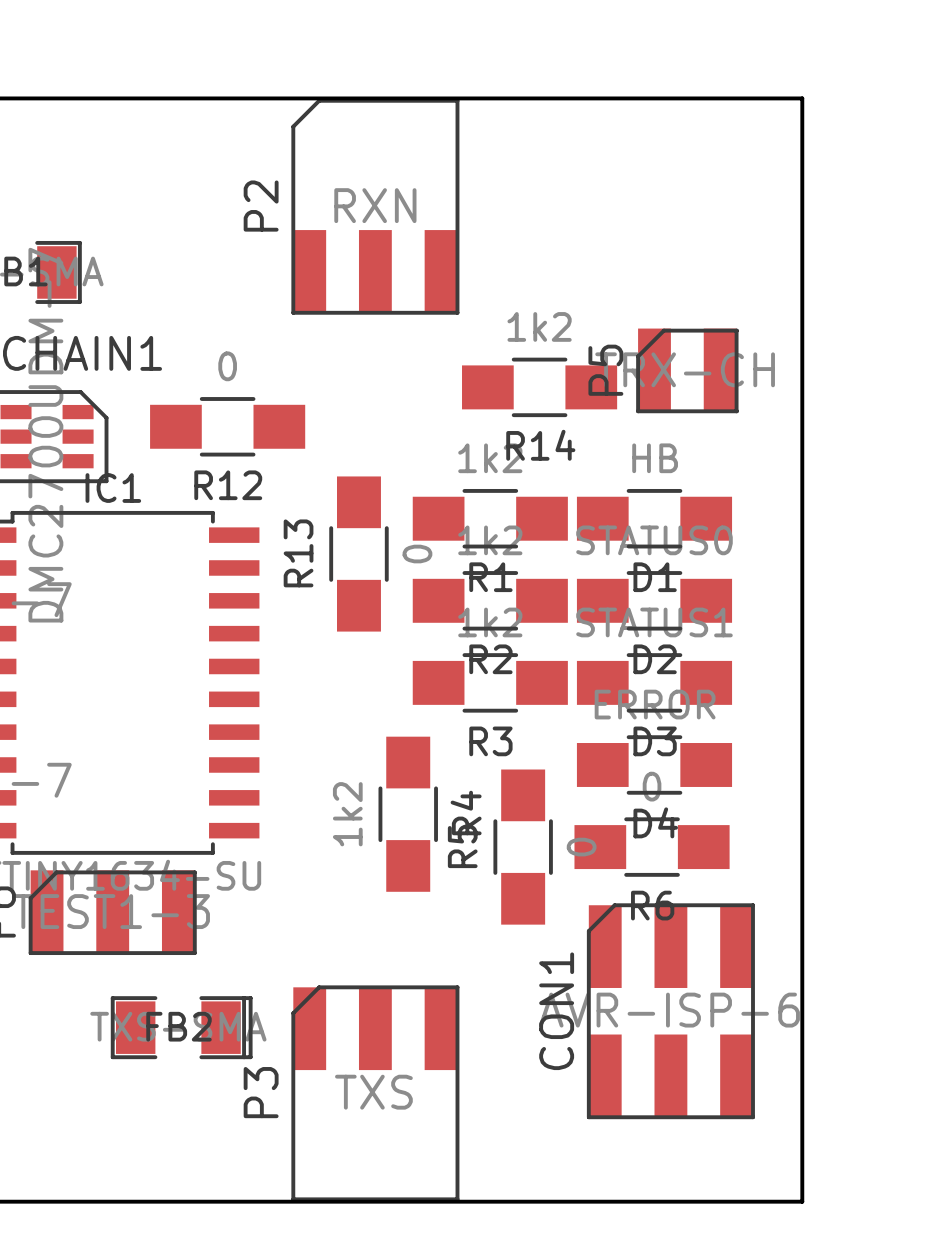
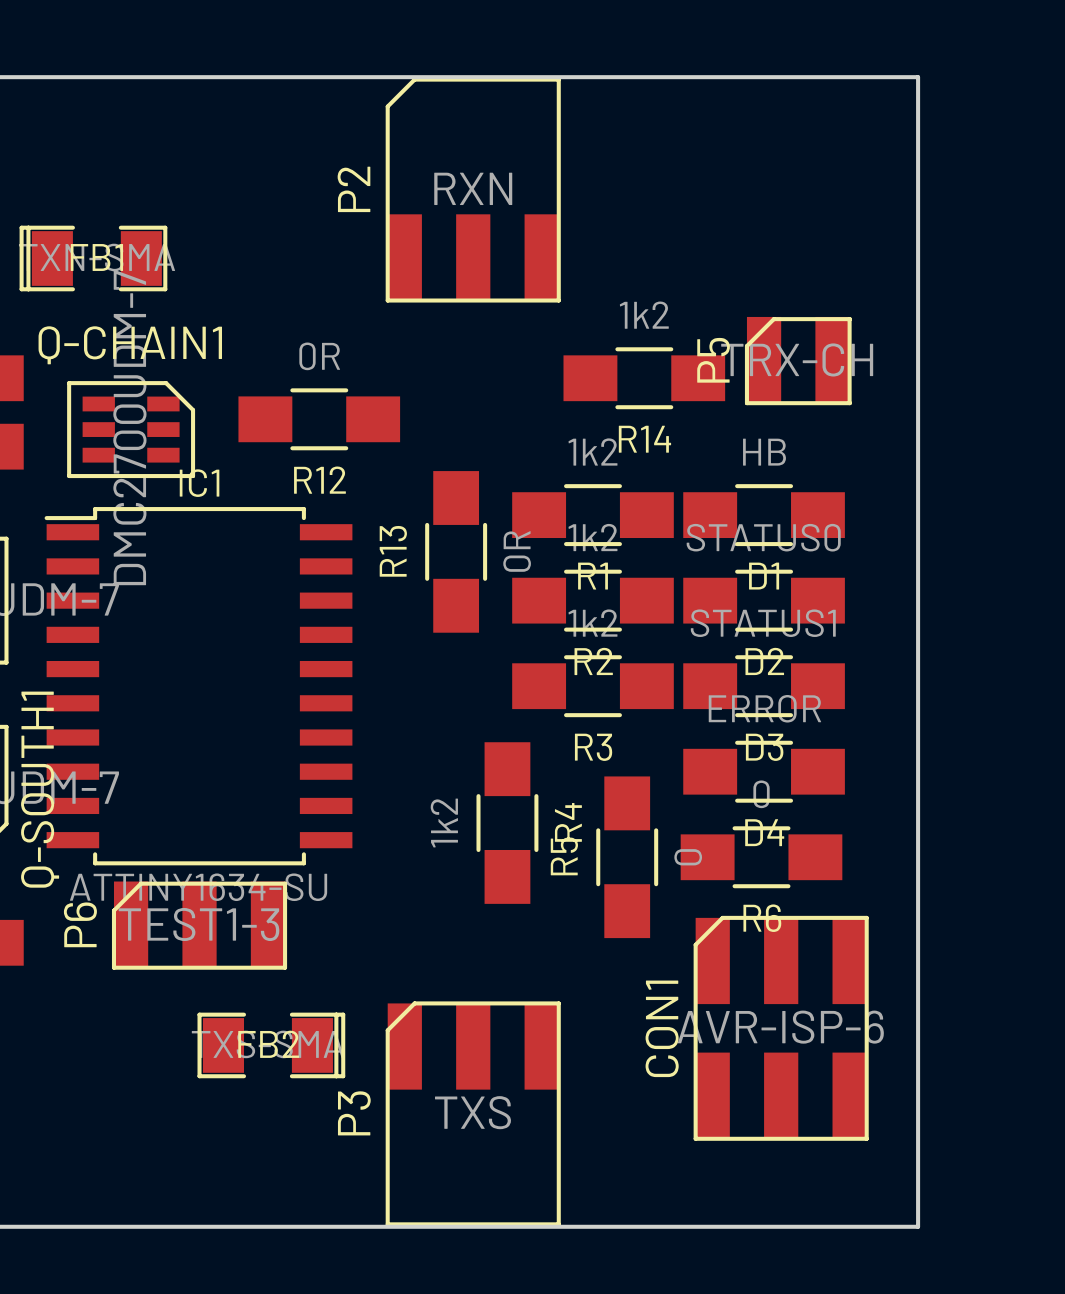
R12 value: 0 (227, 366) -> 0R (319, 356)
R13 value: 0 (417, 554) -> 0R (517, 551)

